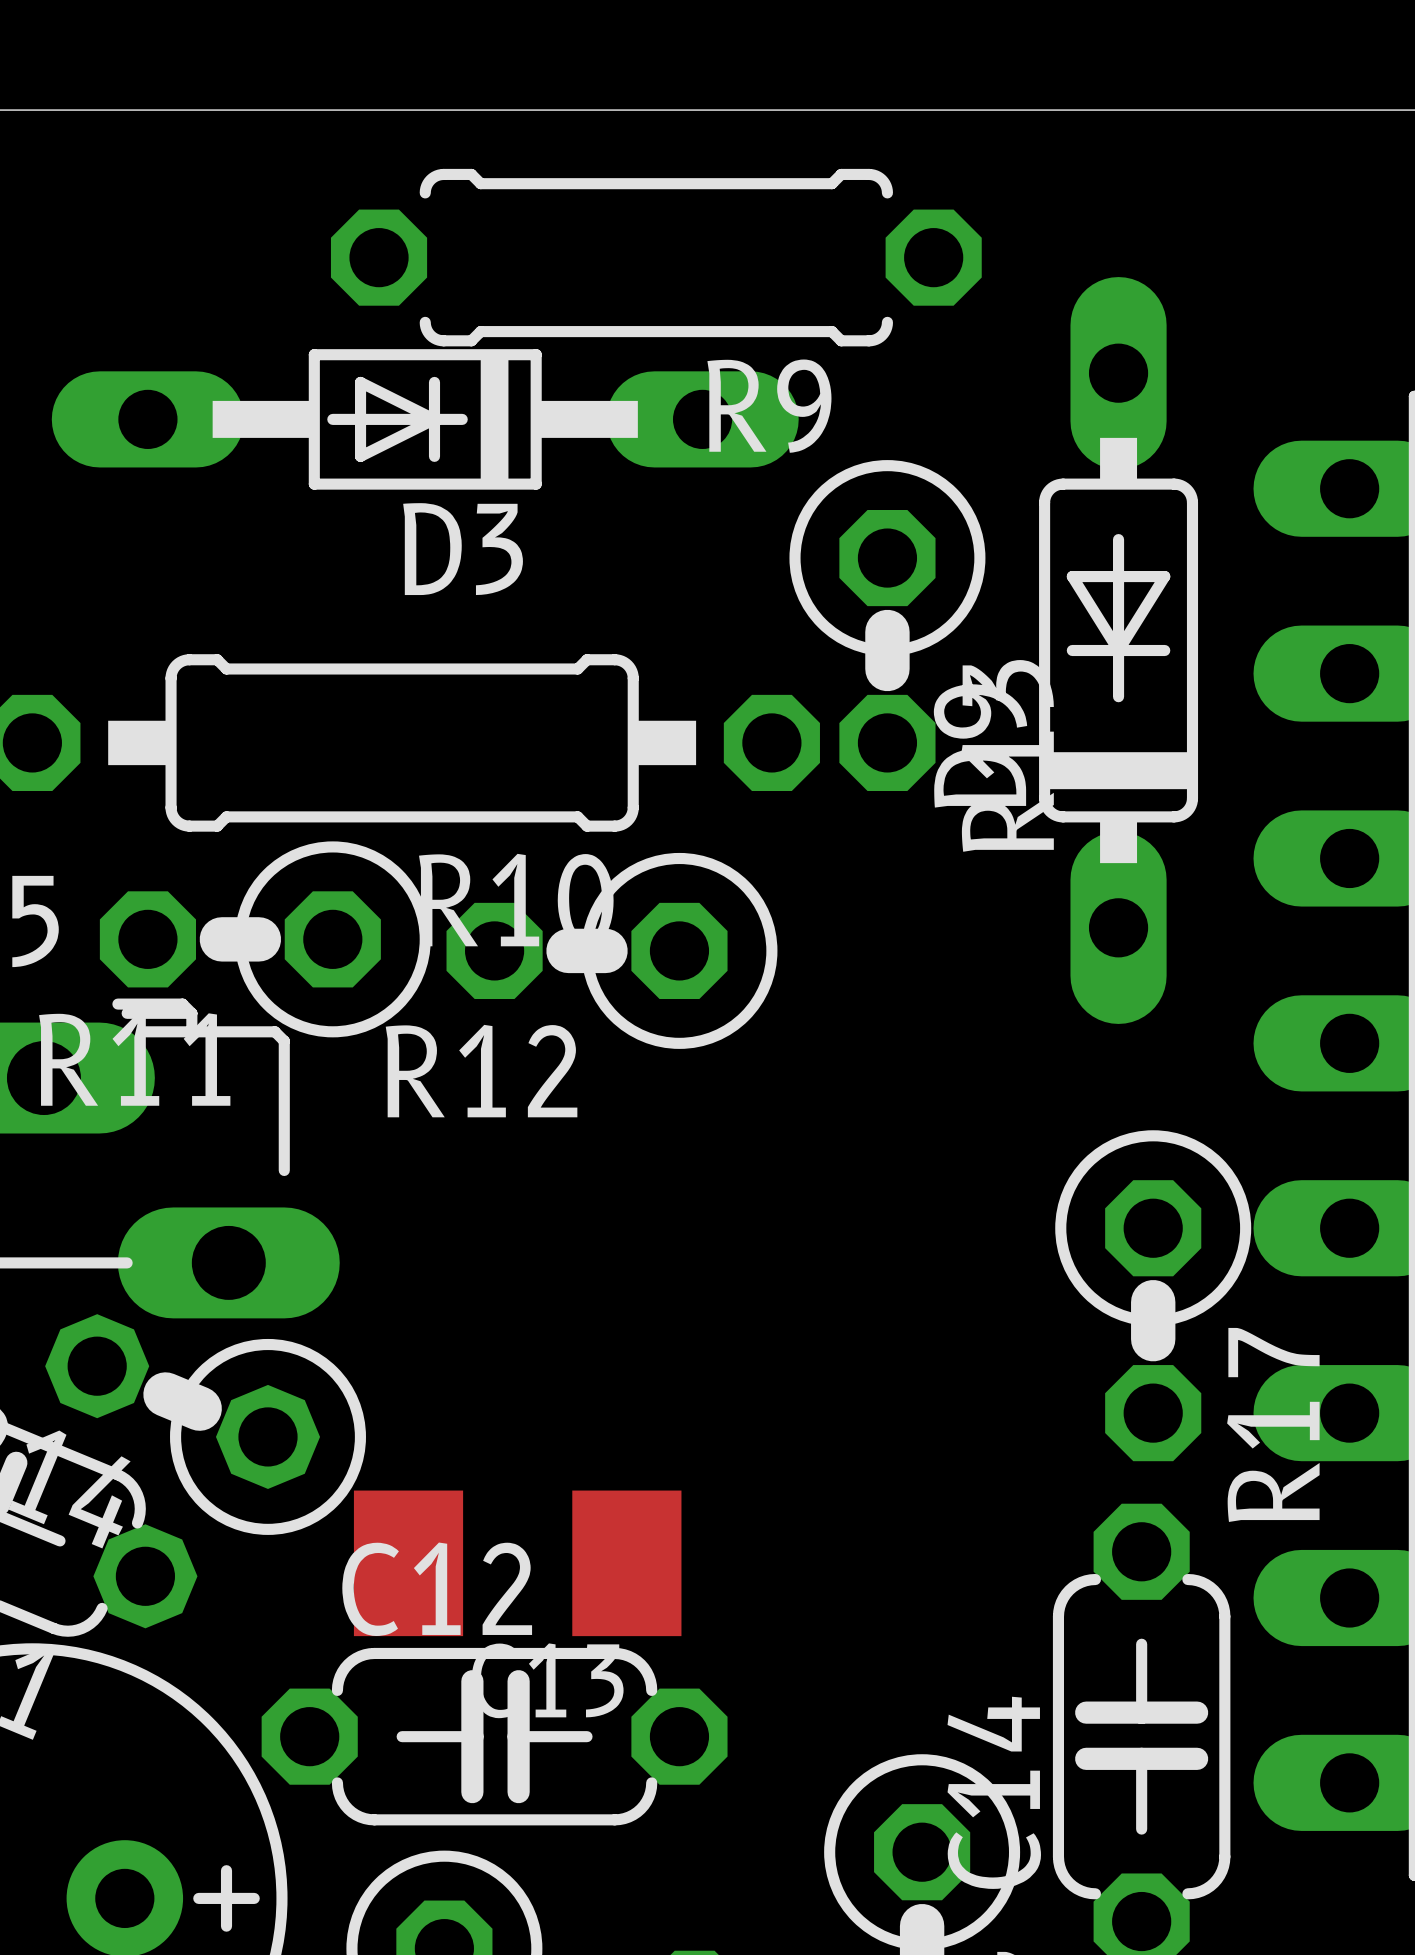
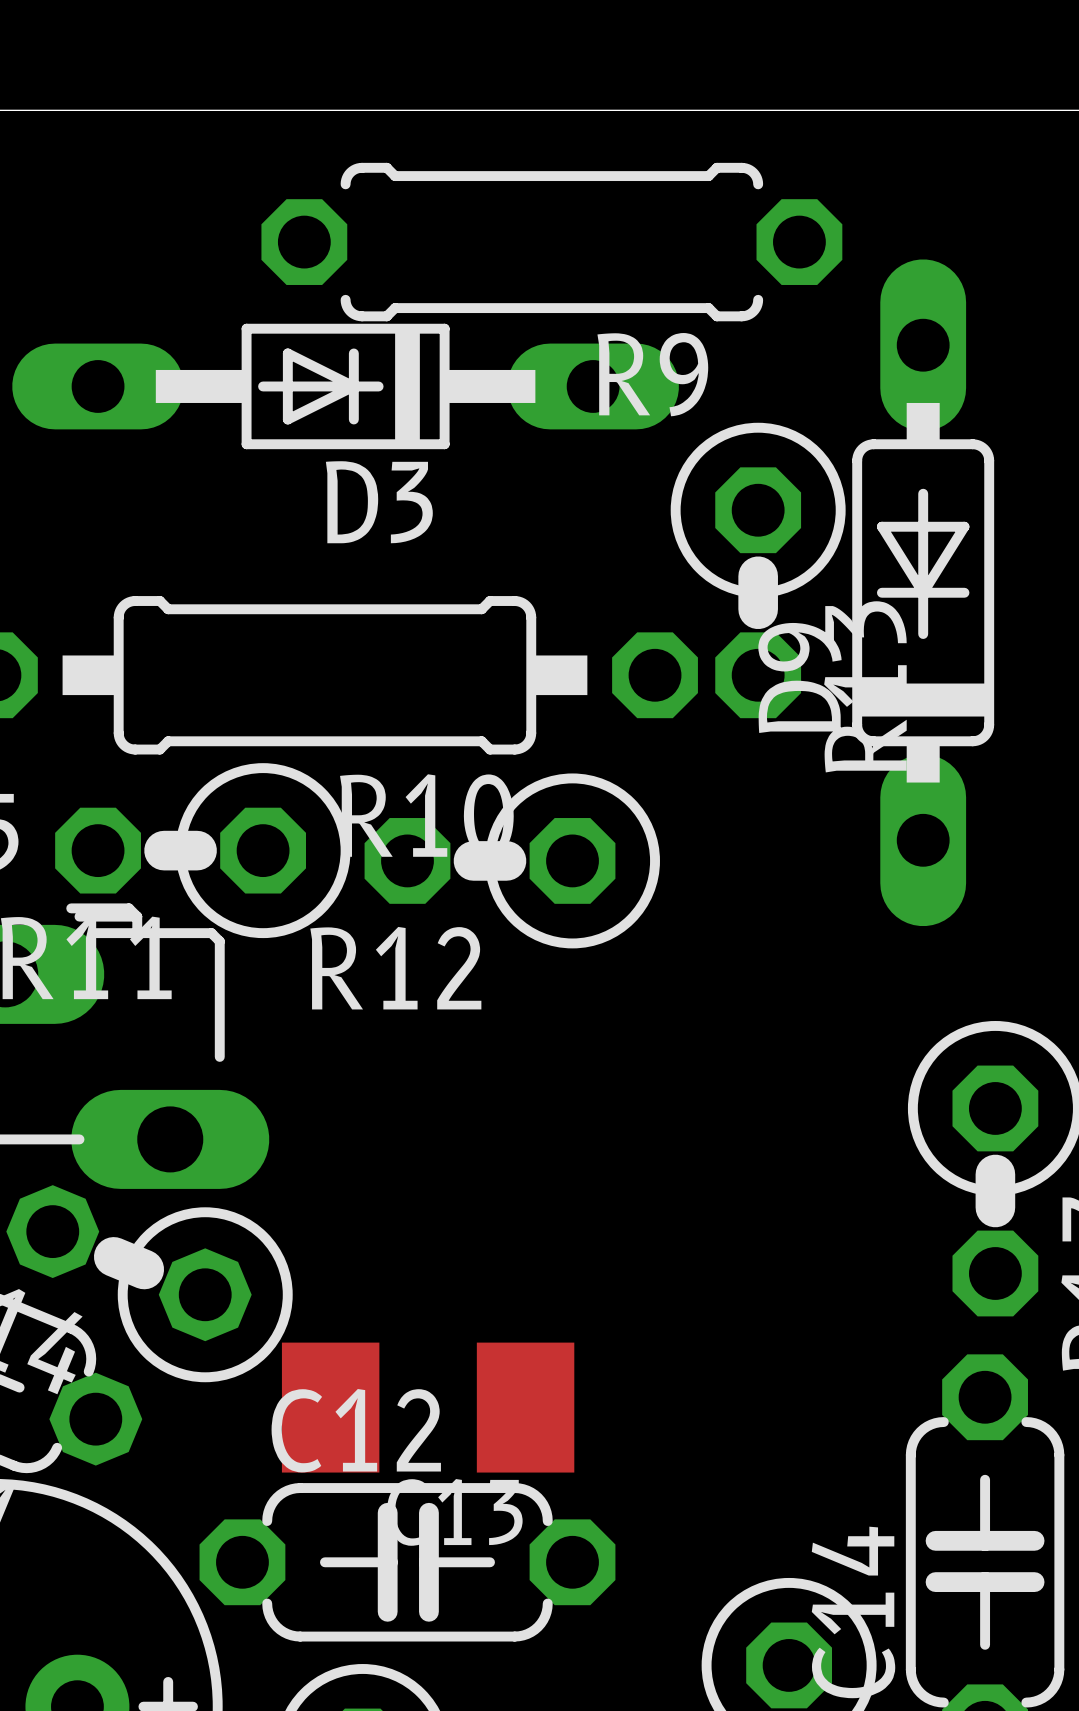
D9 position: (1118, 650) -> (923, 592)

